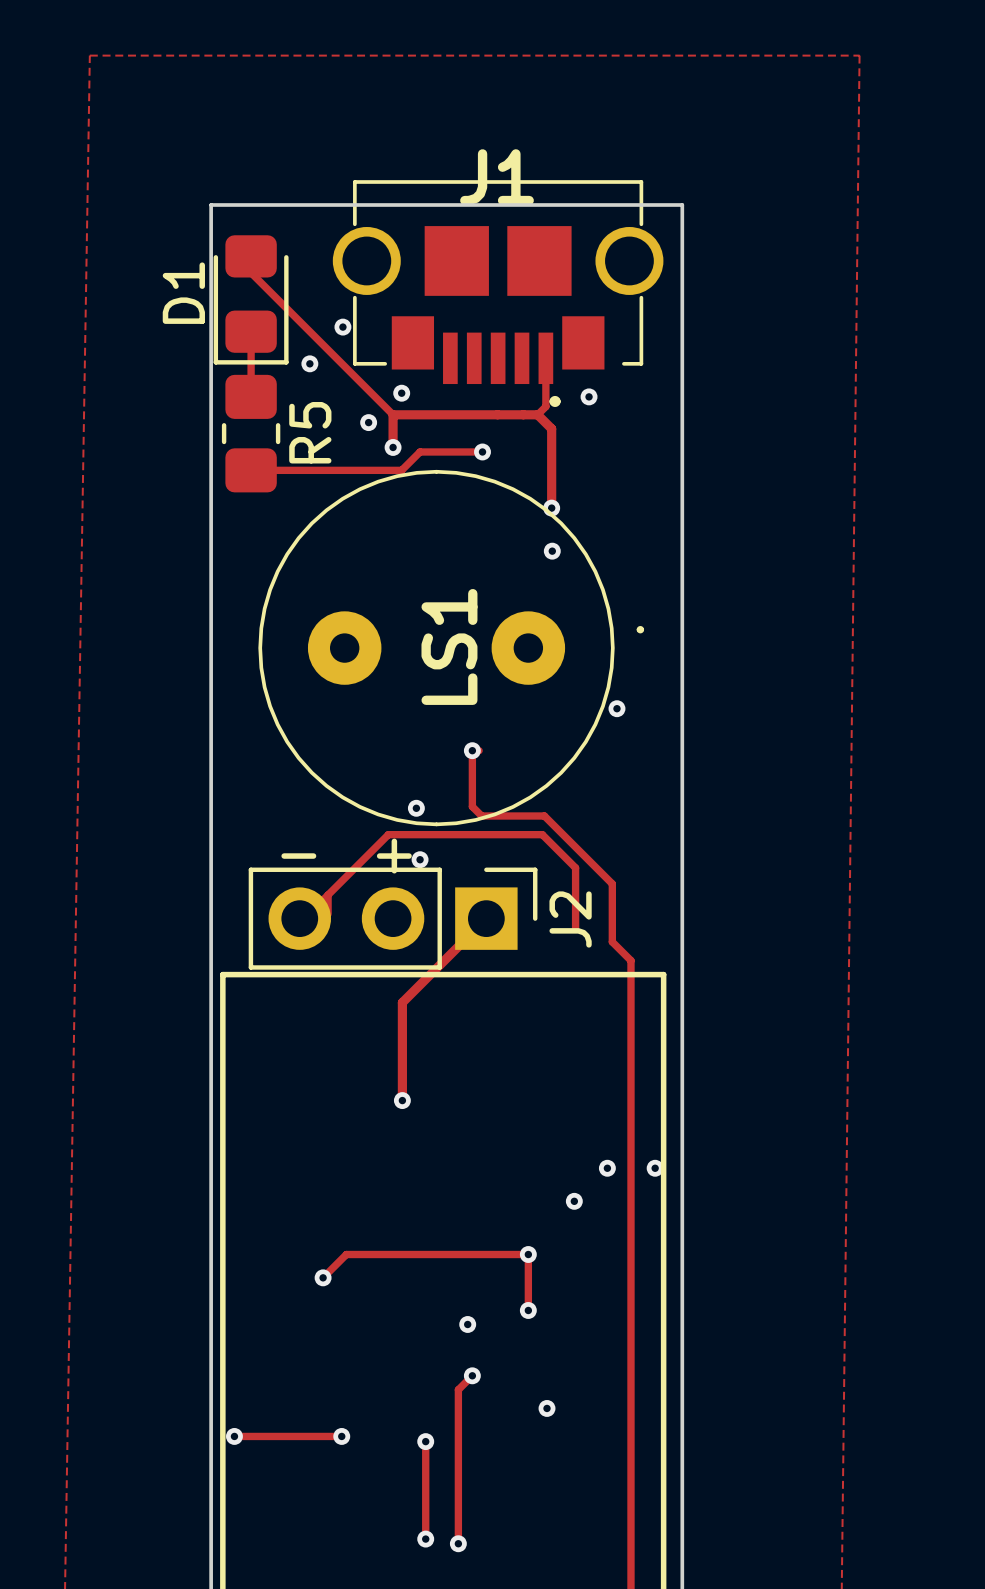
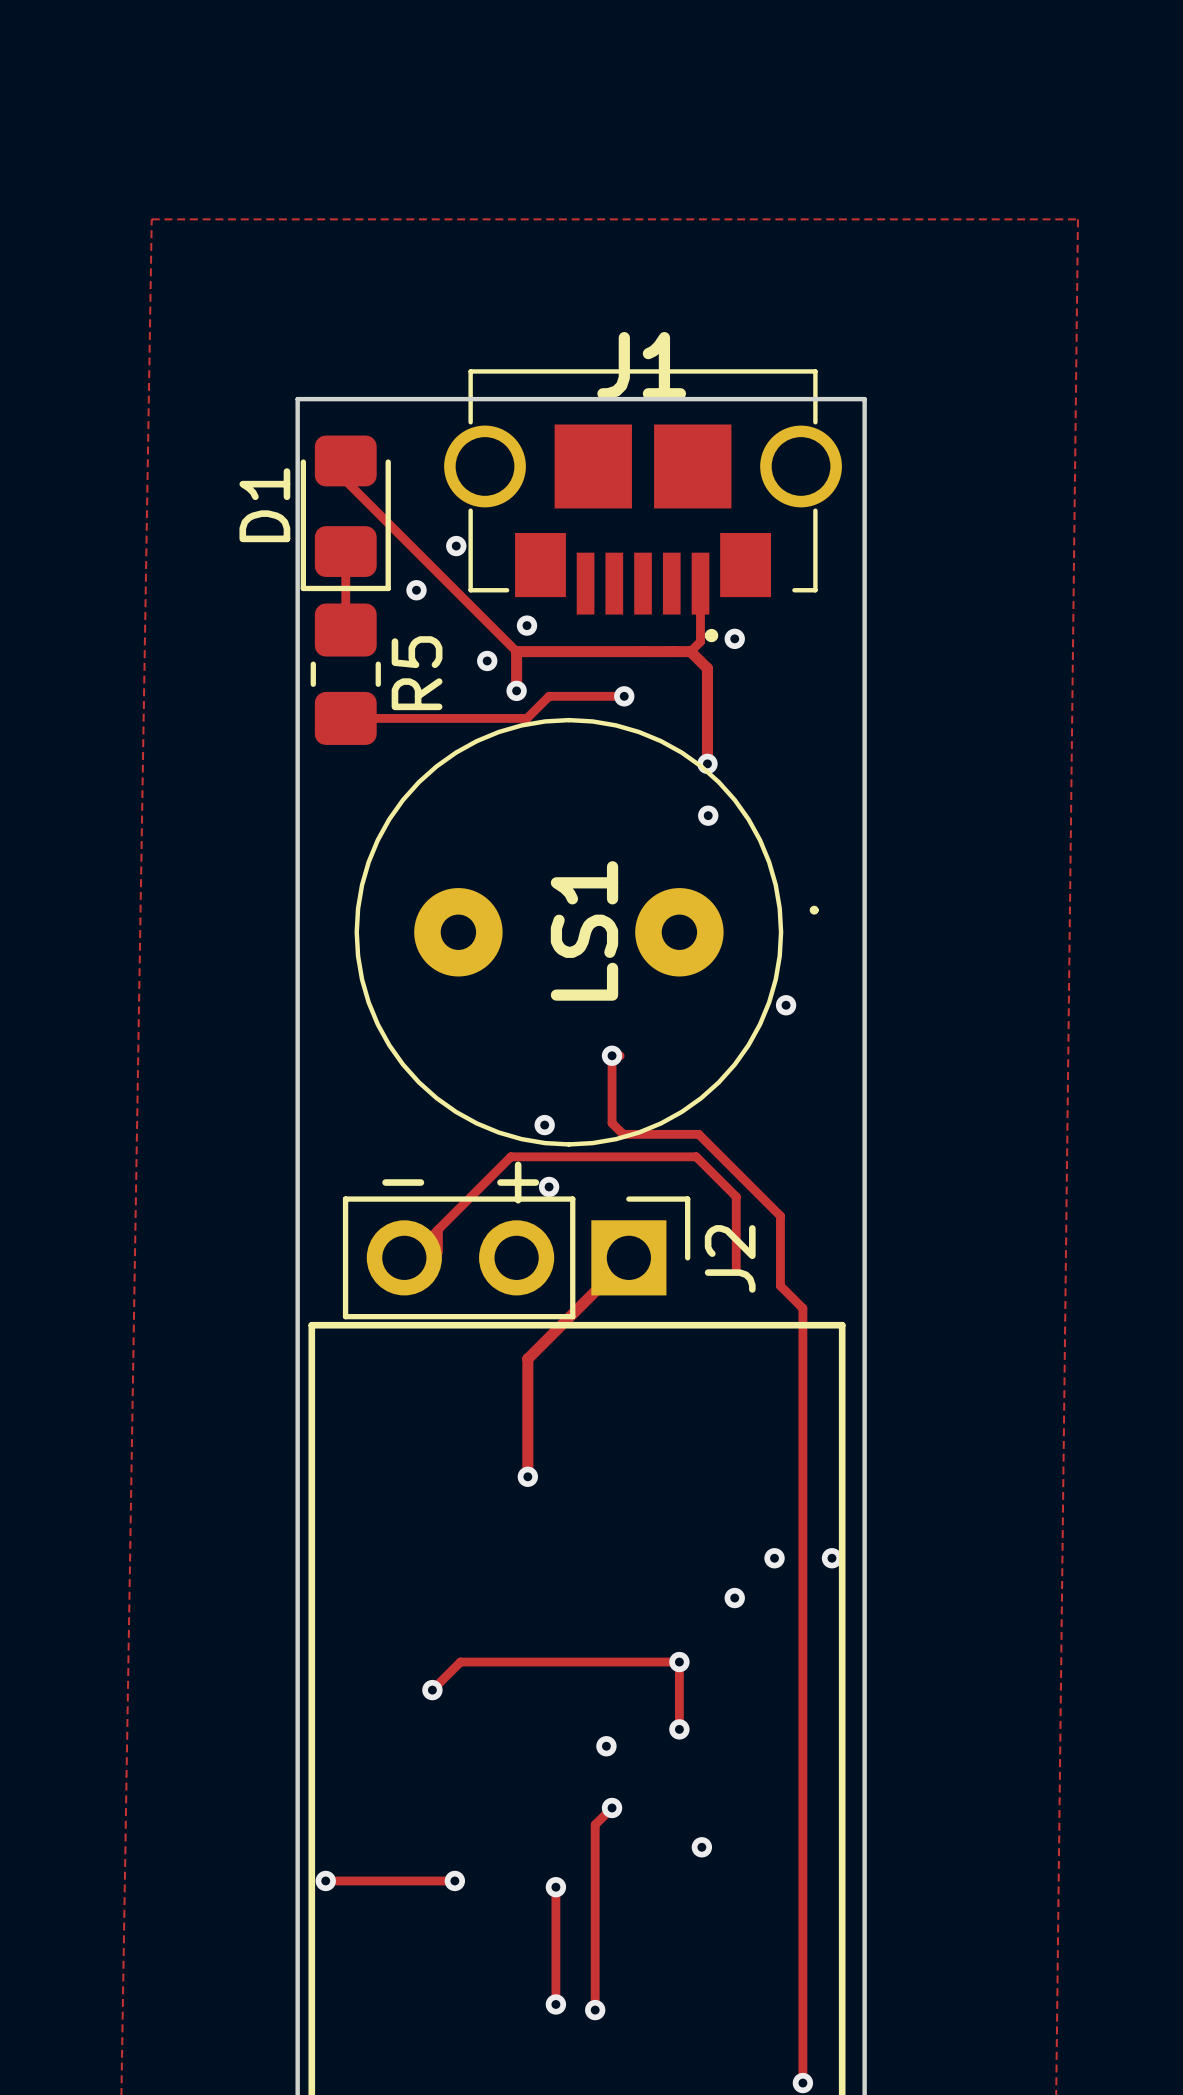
via position: (589, 396) -> (734, 638)

